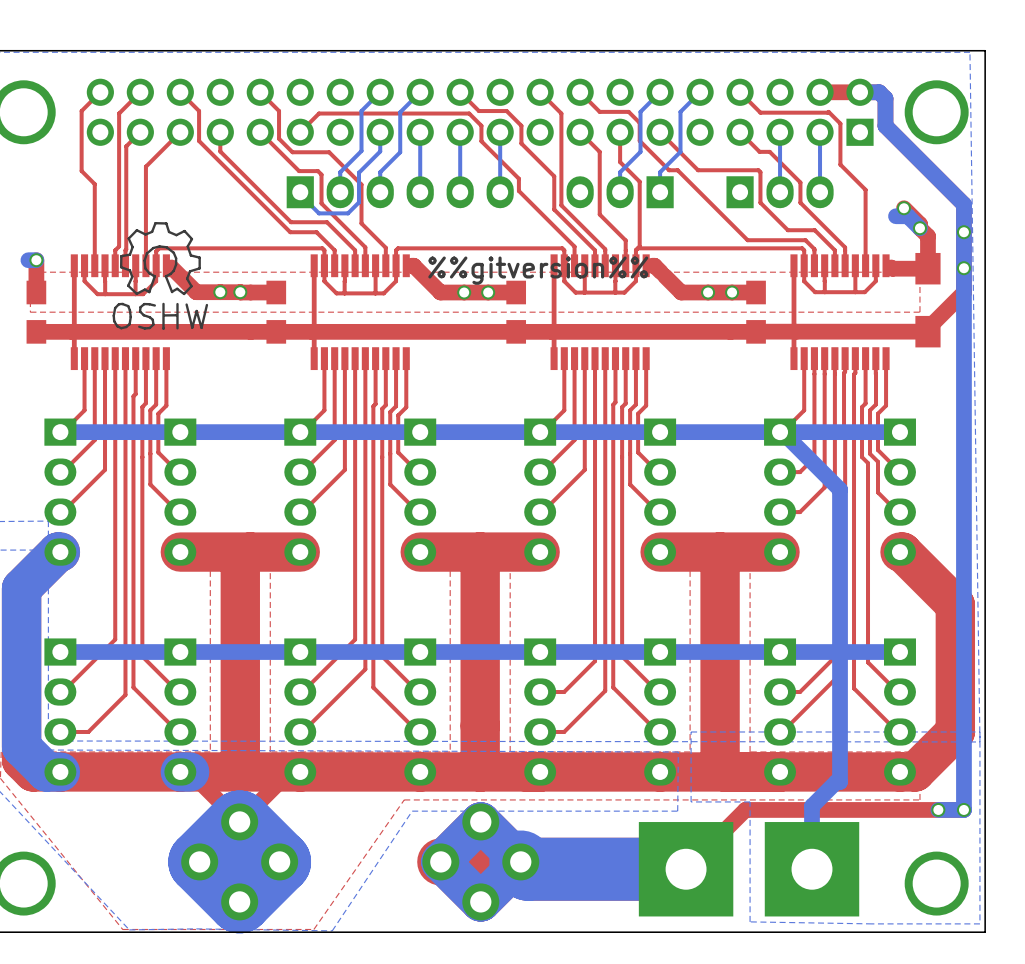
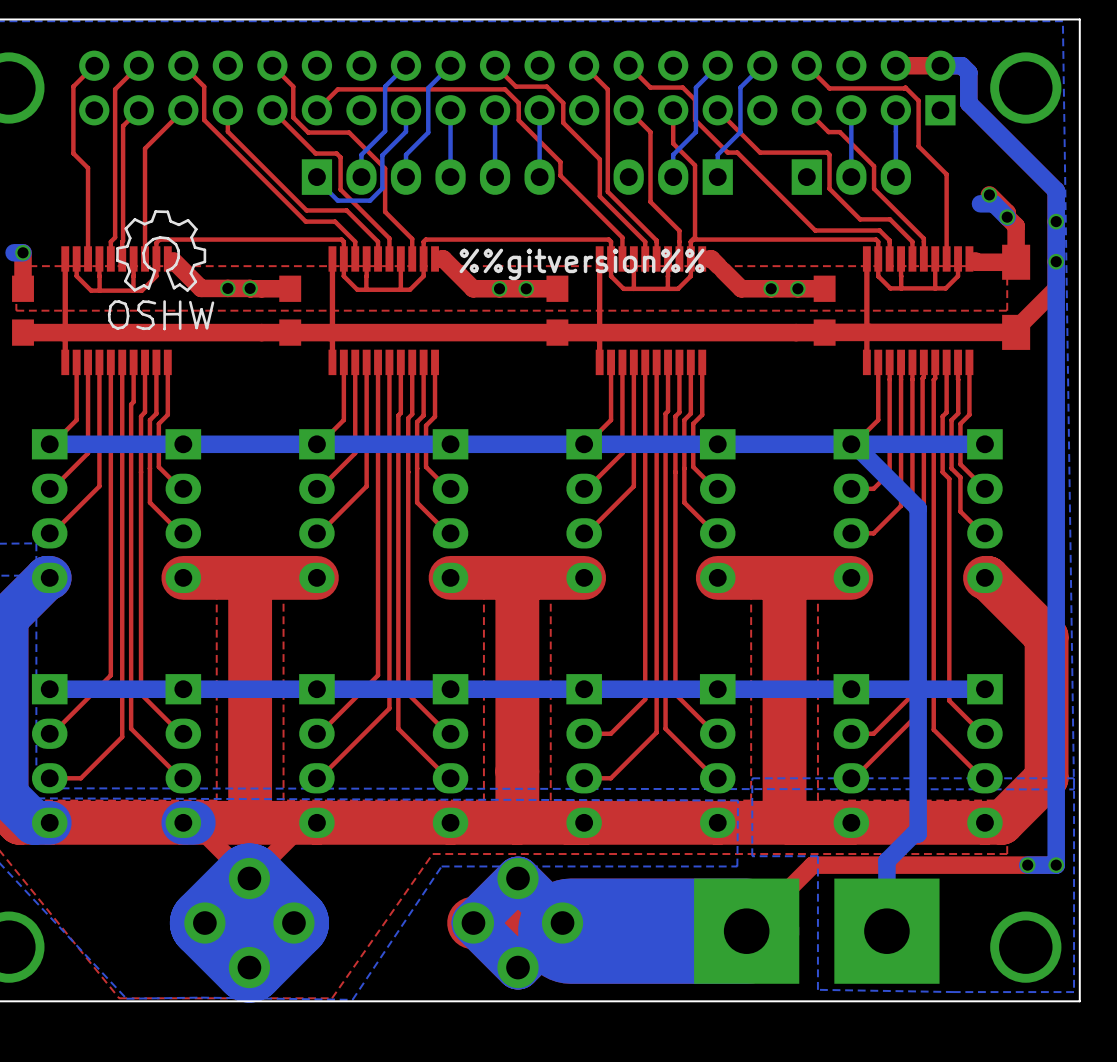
bottom track width: thin (686, 869) (528, 869) -> thick (746, 931) (570, 931)

